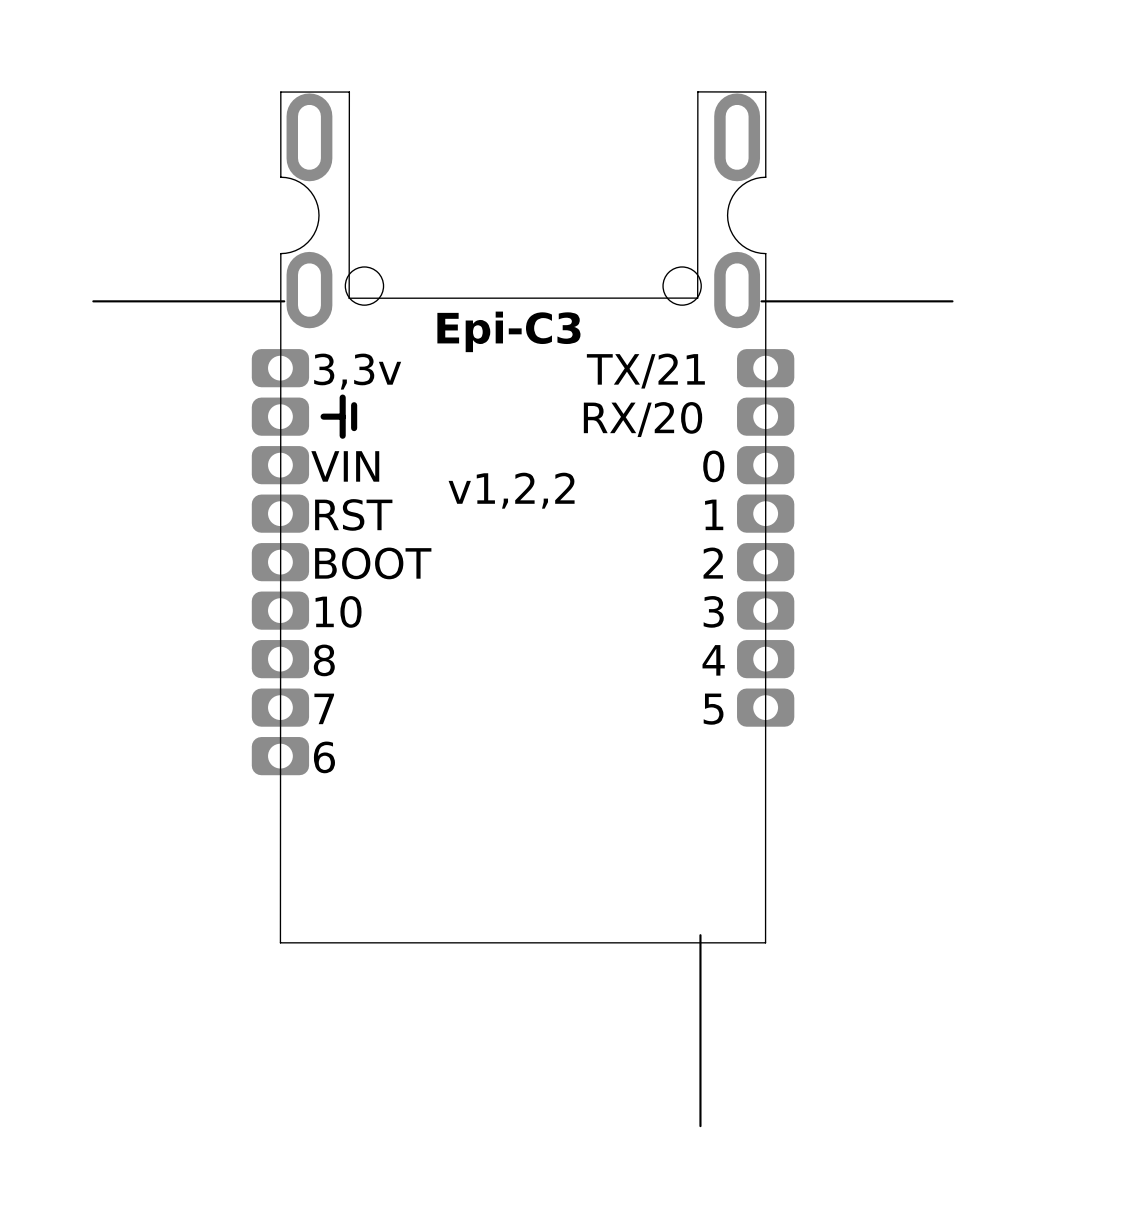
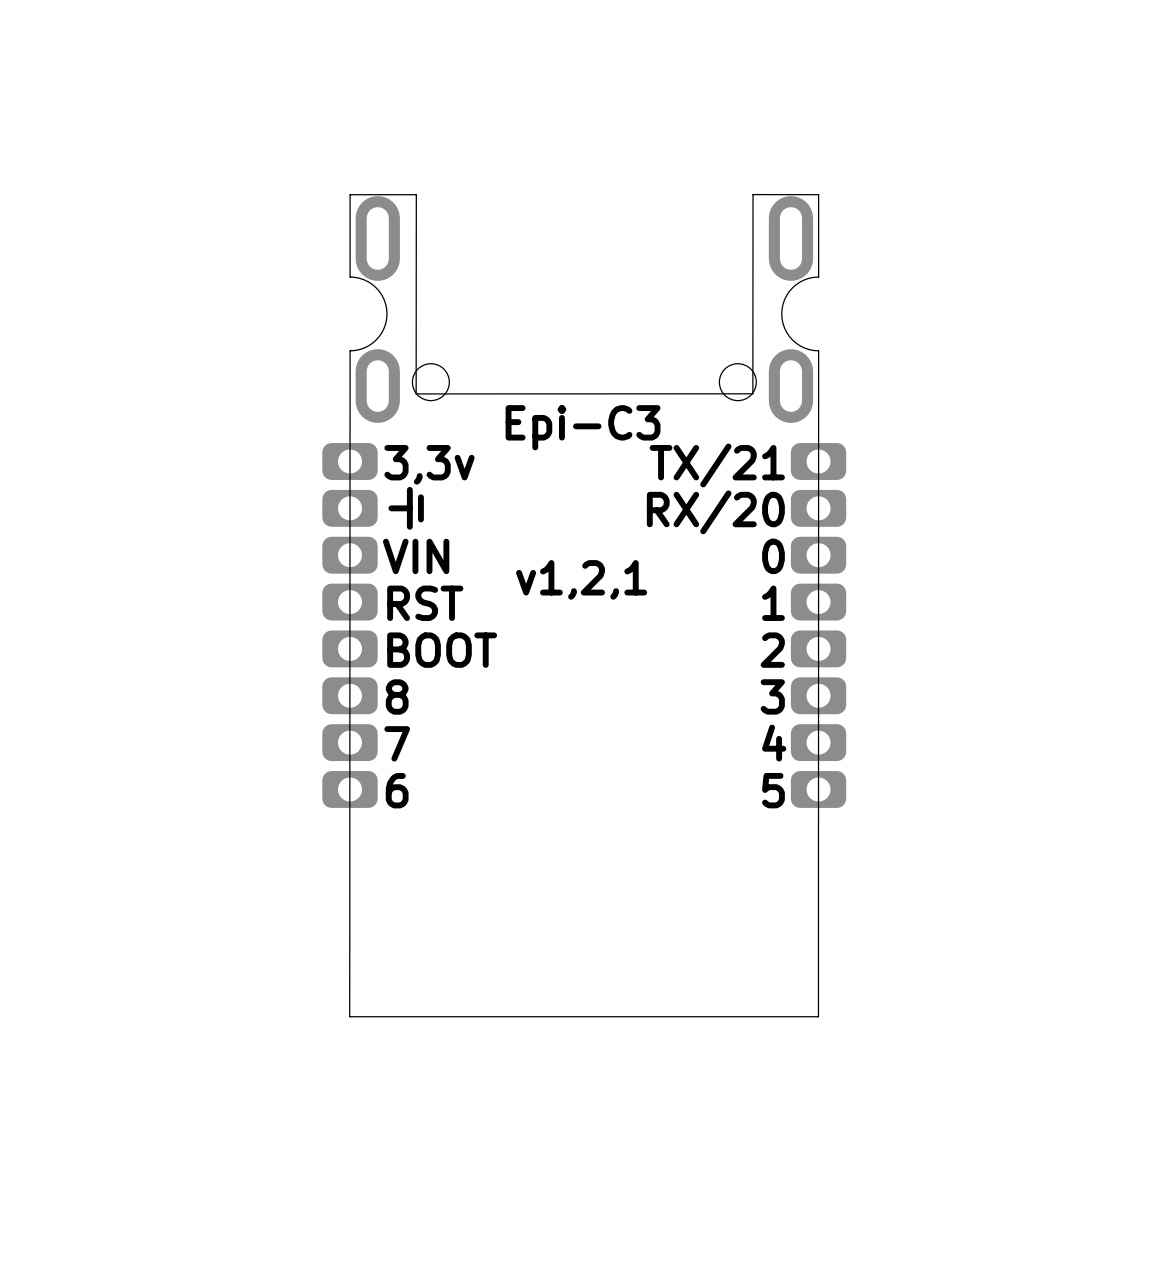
board edge: (284, 301) (93, 301) -> none
board edge: (952, 301) (761, 301) -> none
part footprint: [251, 349, 310, 776] -> [322, 443, 378, 808]
text: v1,2,2 (511, 490) -> v1,2,1 (581, 579)
text: 10 (338, 611) -> 8 (397, 696)
text: 8 (324, 660) -> 7 (397, 743)
text: 7 (324, 708) -> 6 (397, 790)
text: 6 (324, 757) -> none
board edge: (700, 935) (700, 1126) -> none

